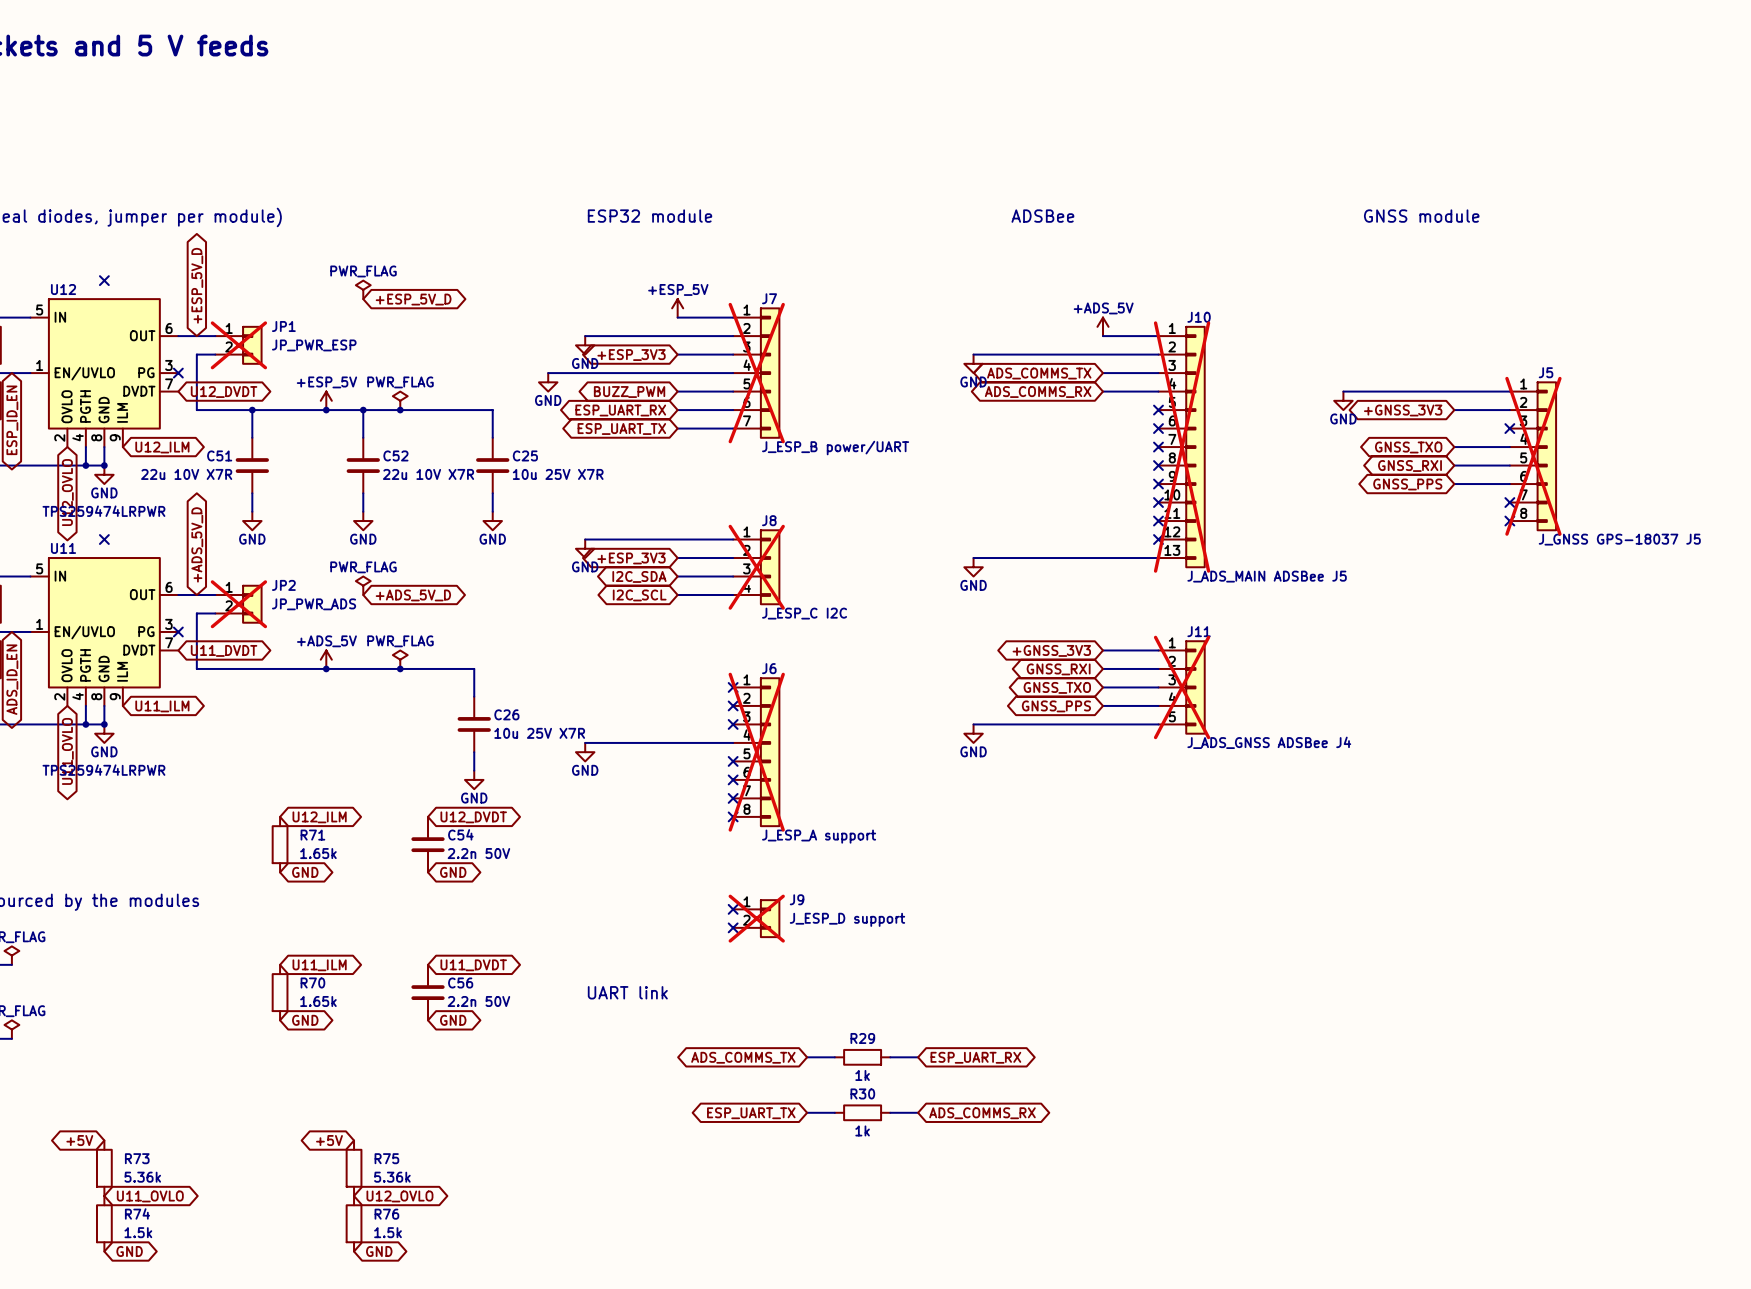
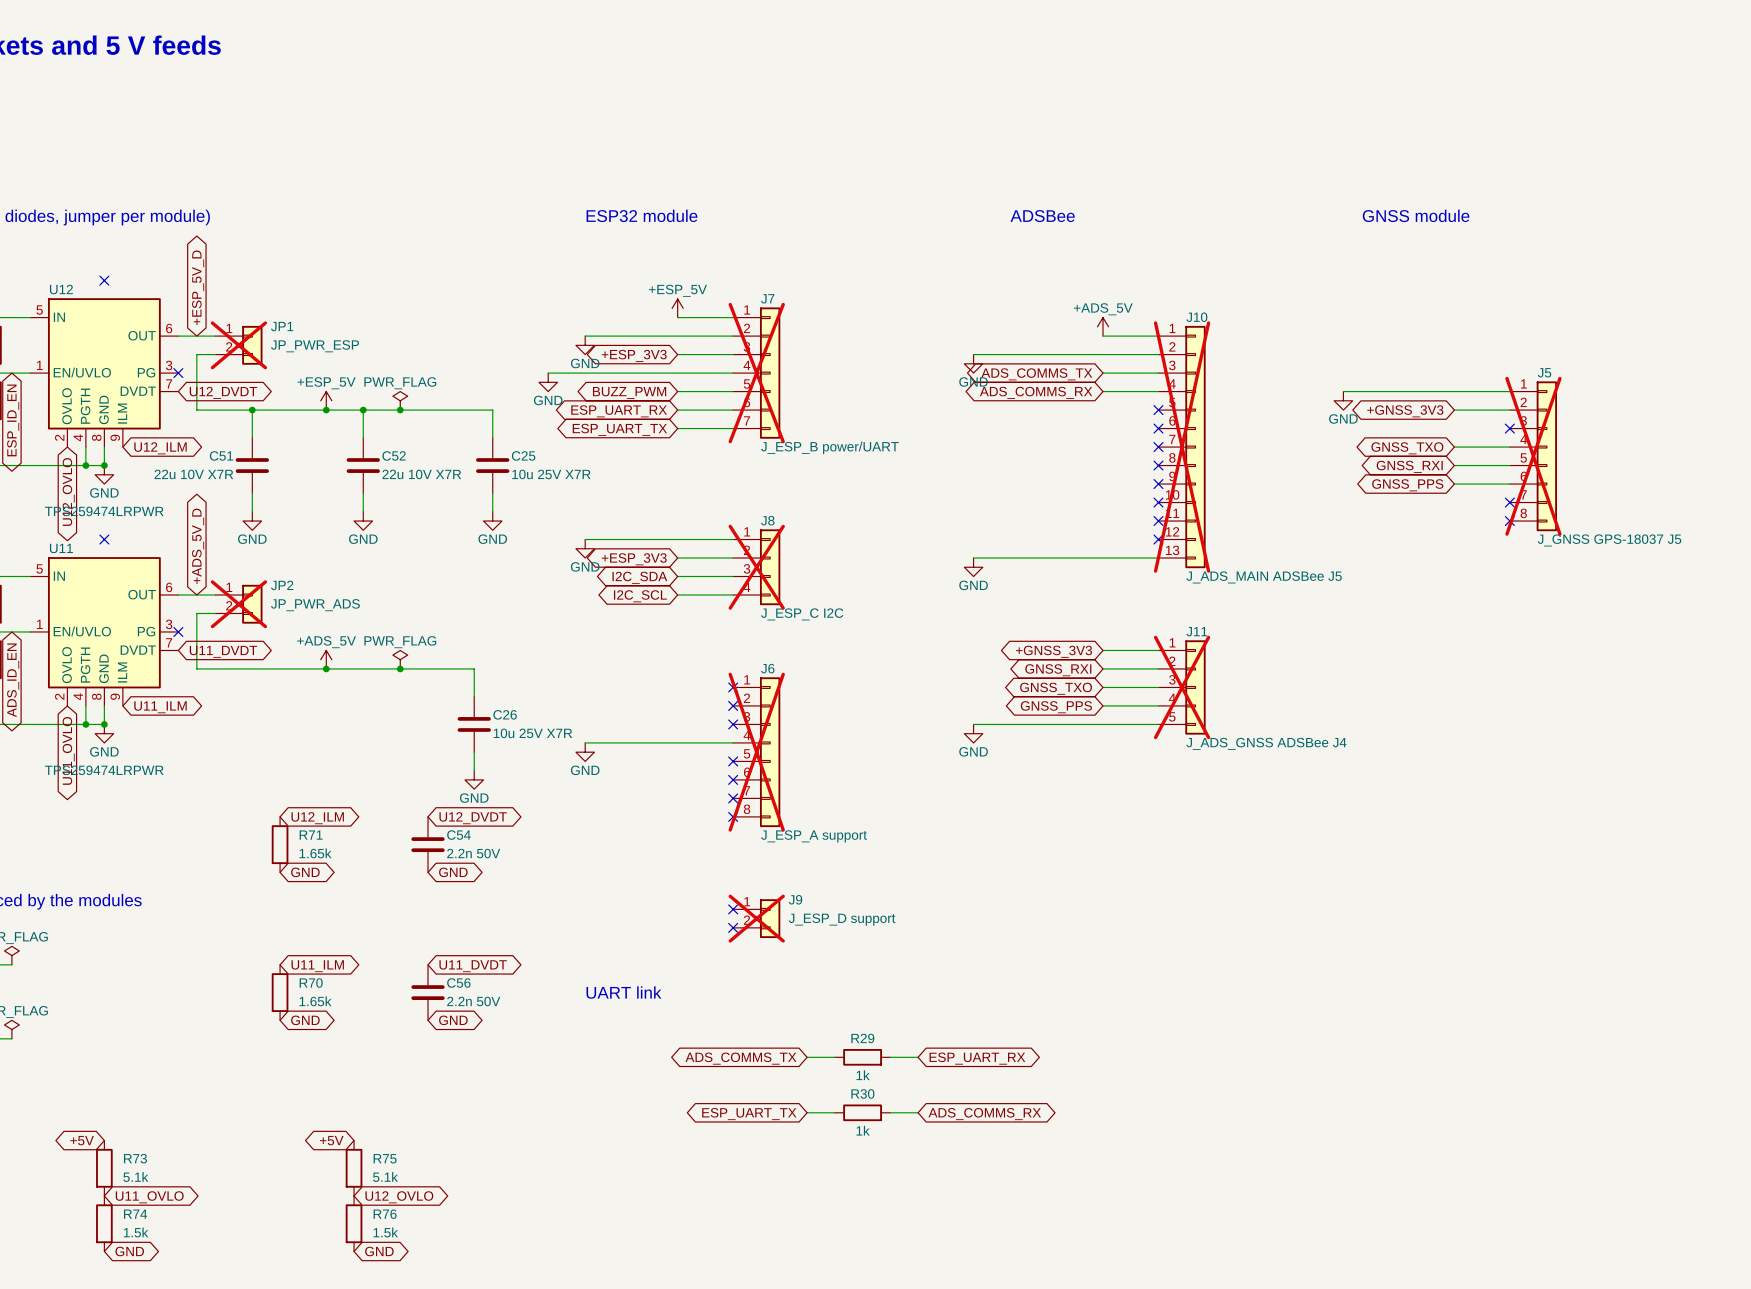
power symbol: PWR_FLAG (363, 289) -> none
global label: +ESP_5V_D (413, 299) -> none
power symbol: PWR_FLAG (363, 585) -> none
global label: +ADS_5V_D (413, 595) -> none
R73 value: 5.36k (142, 1177) -> 5.1k (135, 1177)
R75 value: 5.36k (392, 1177) -> 5.1k (385, 1177)

